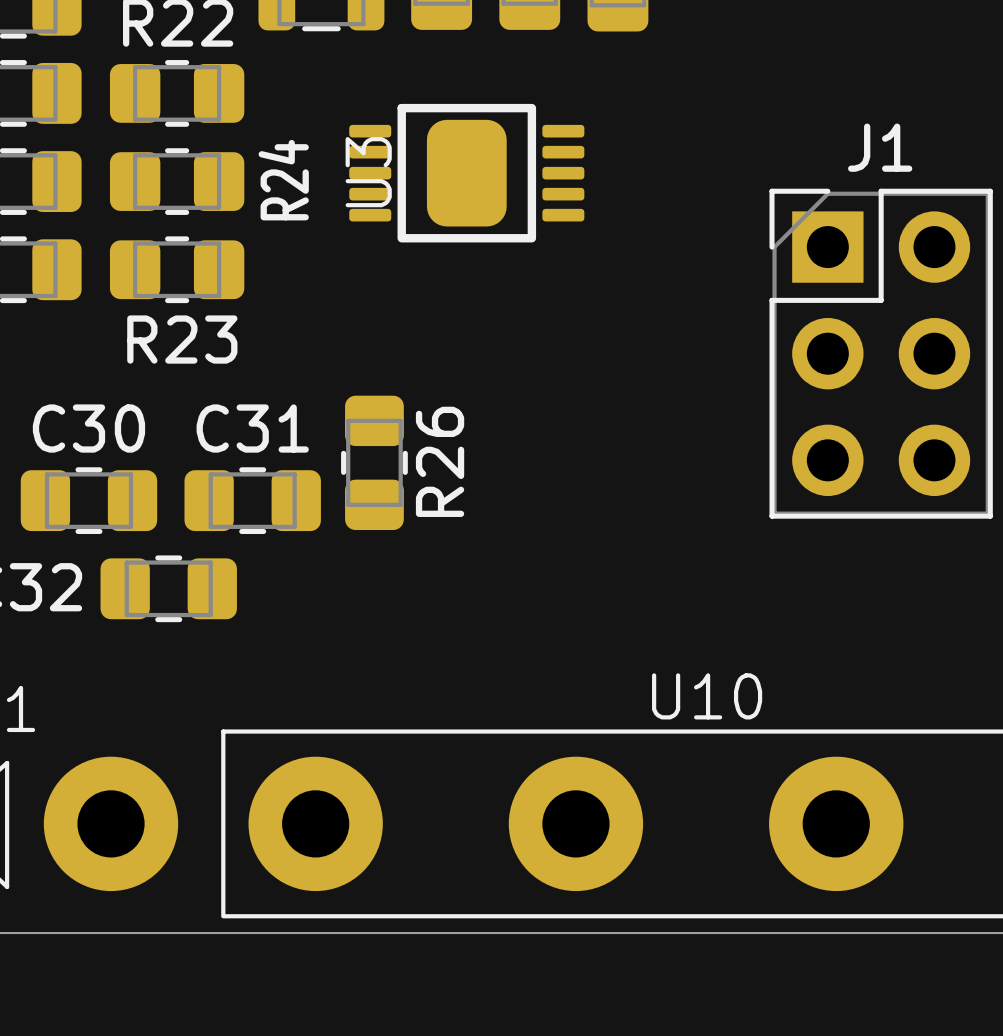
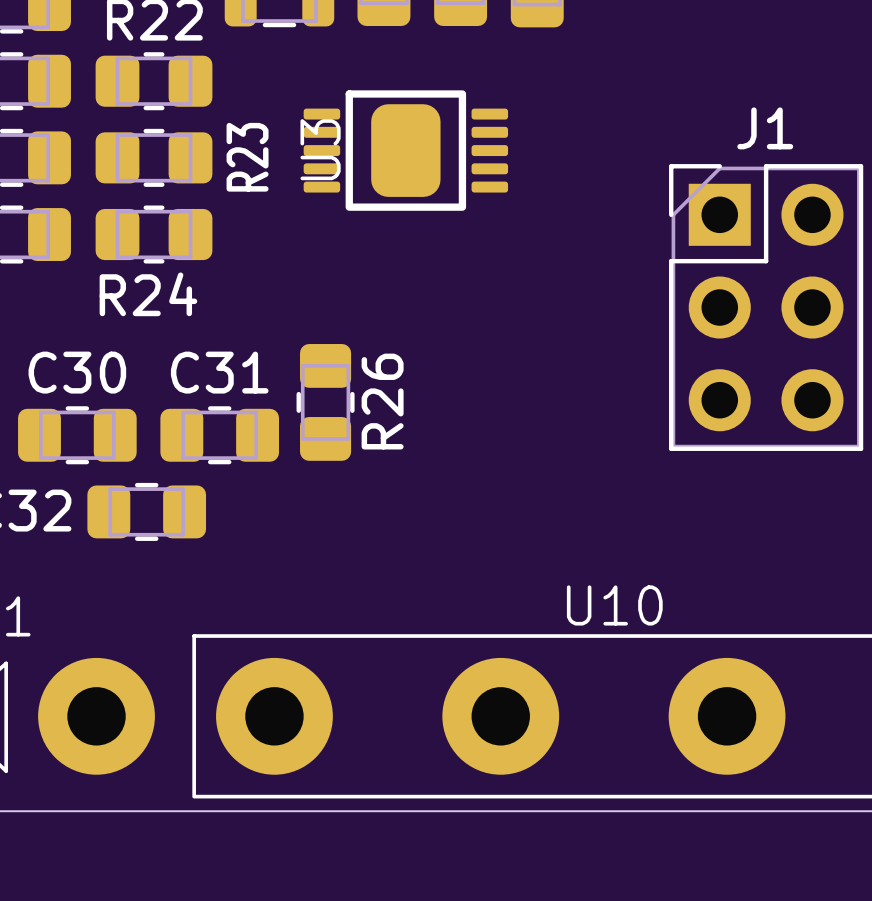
R24 name: R24 (283, 180) -> R23 (247, 157)
R23 name: R23 (182, 339) -> R24 (148, 294)

